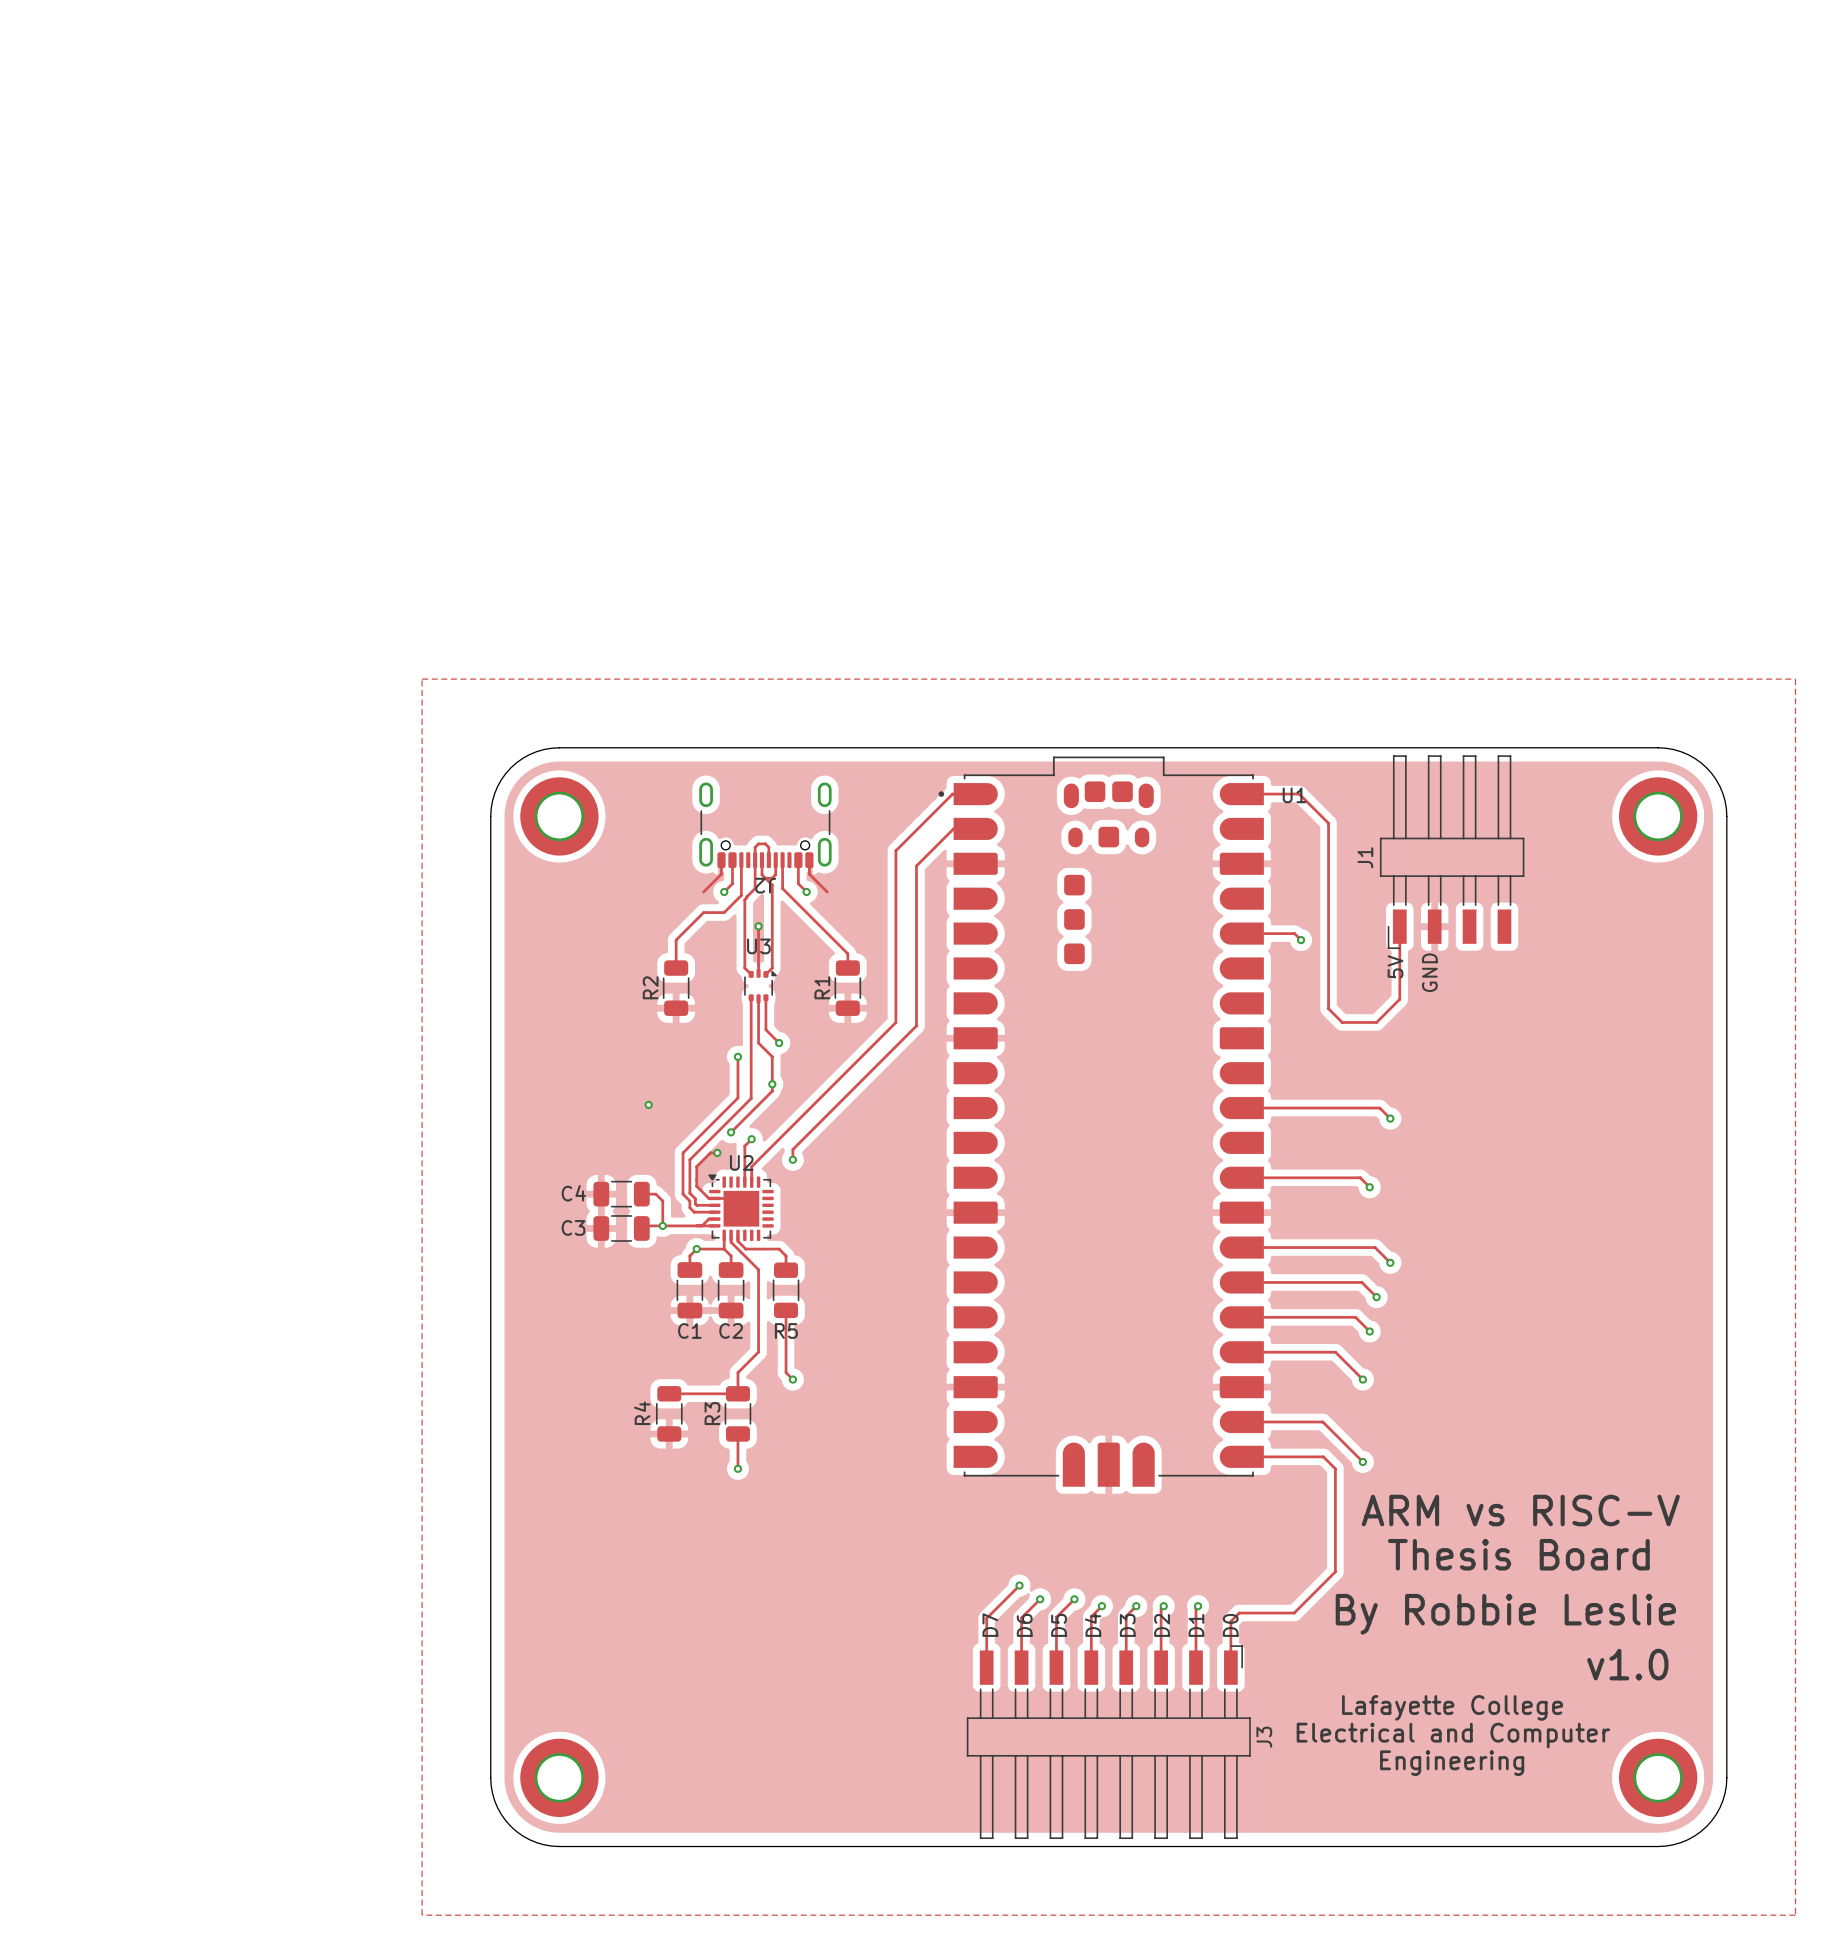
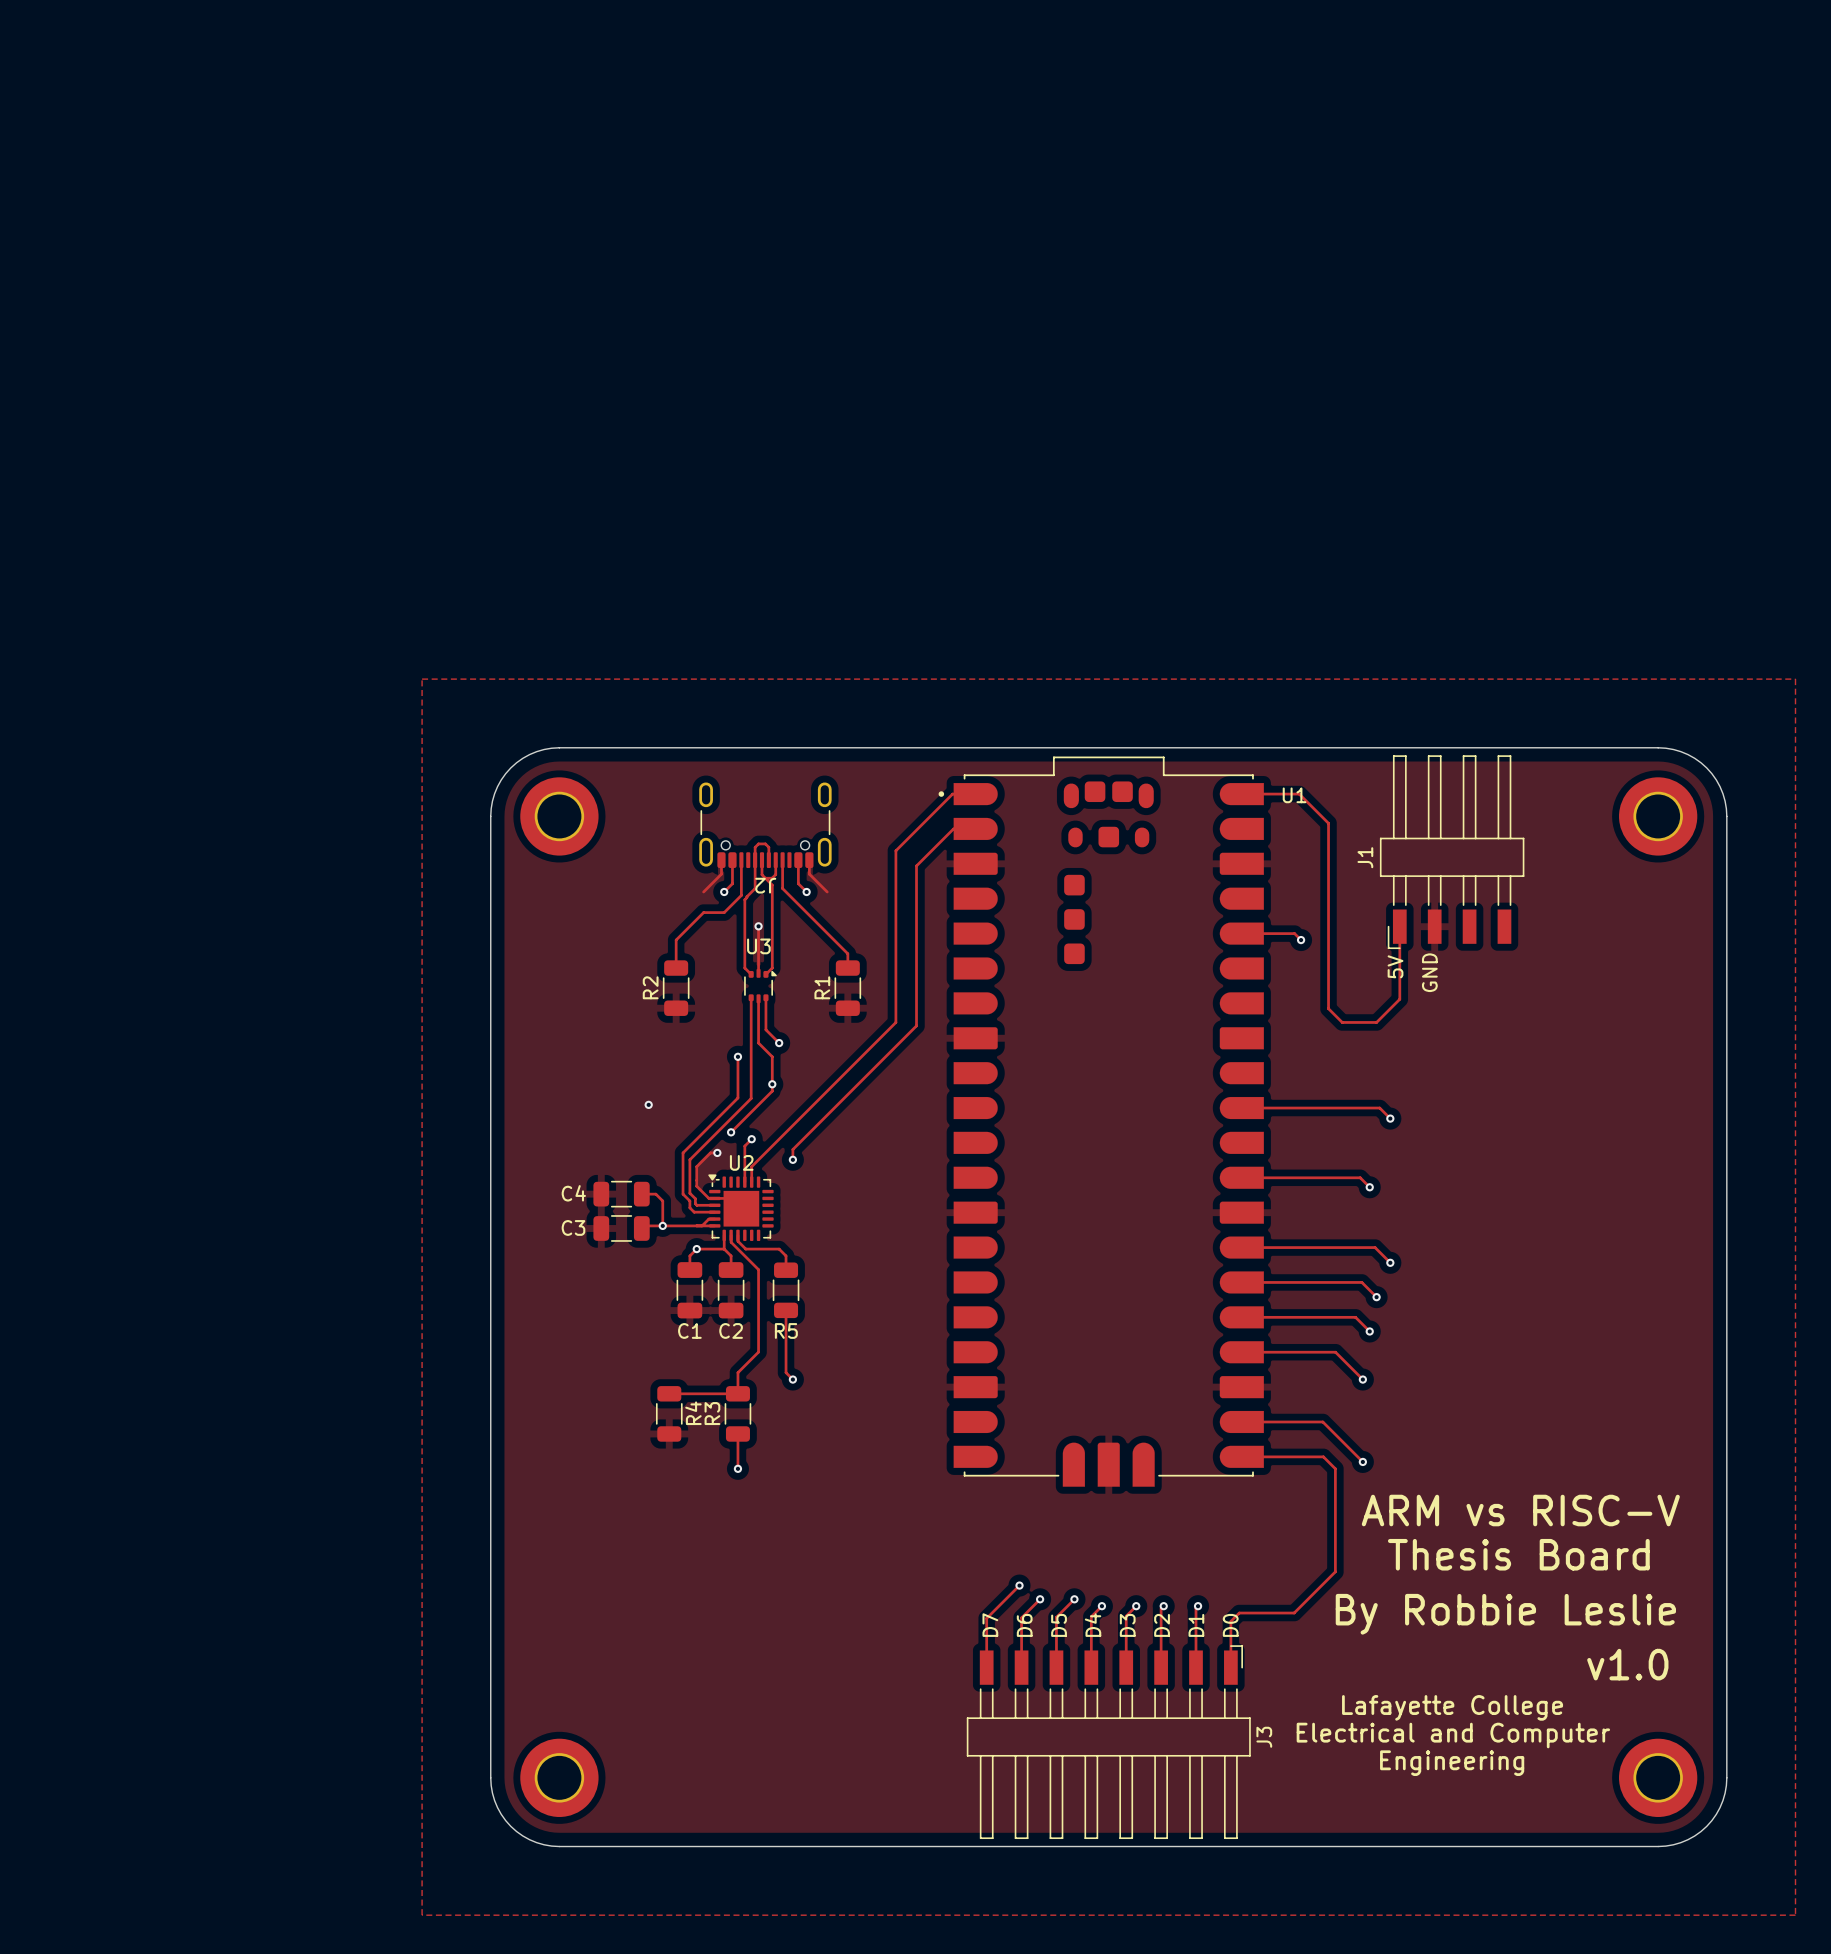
R4 name position: R4 (642, 1413) -> R4 (693, 1413)

